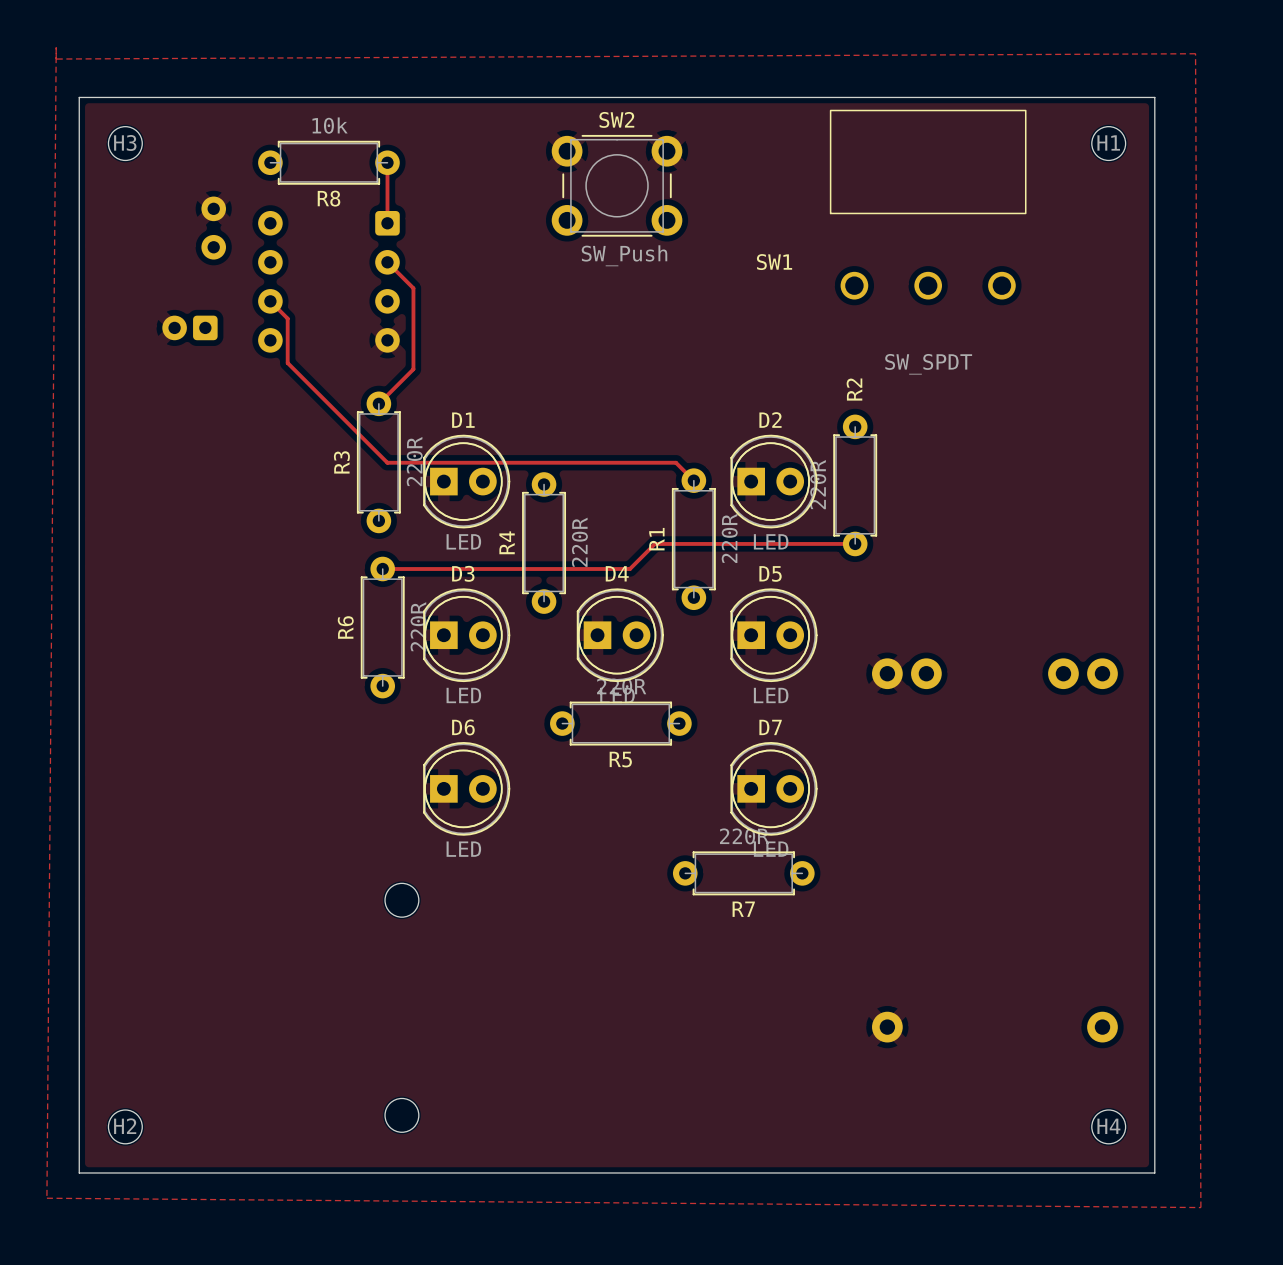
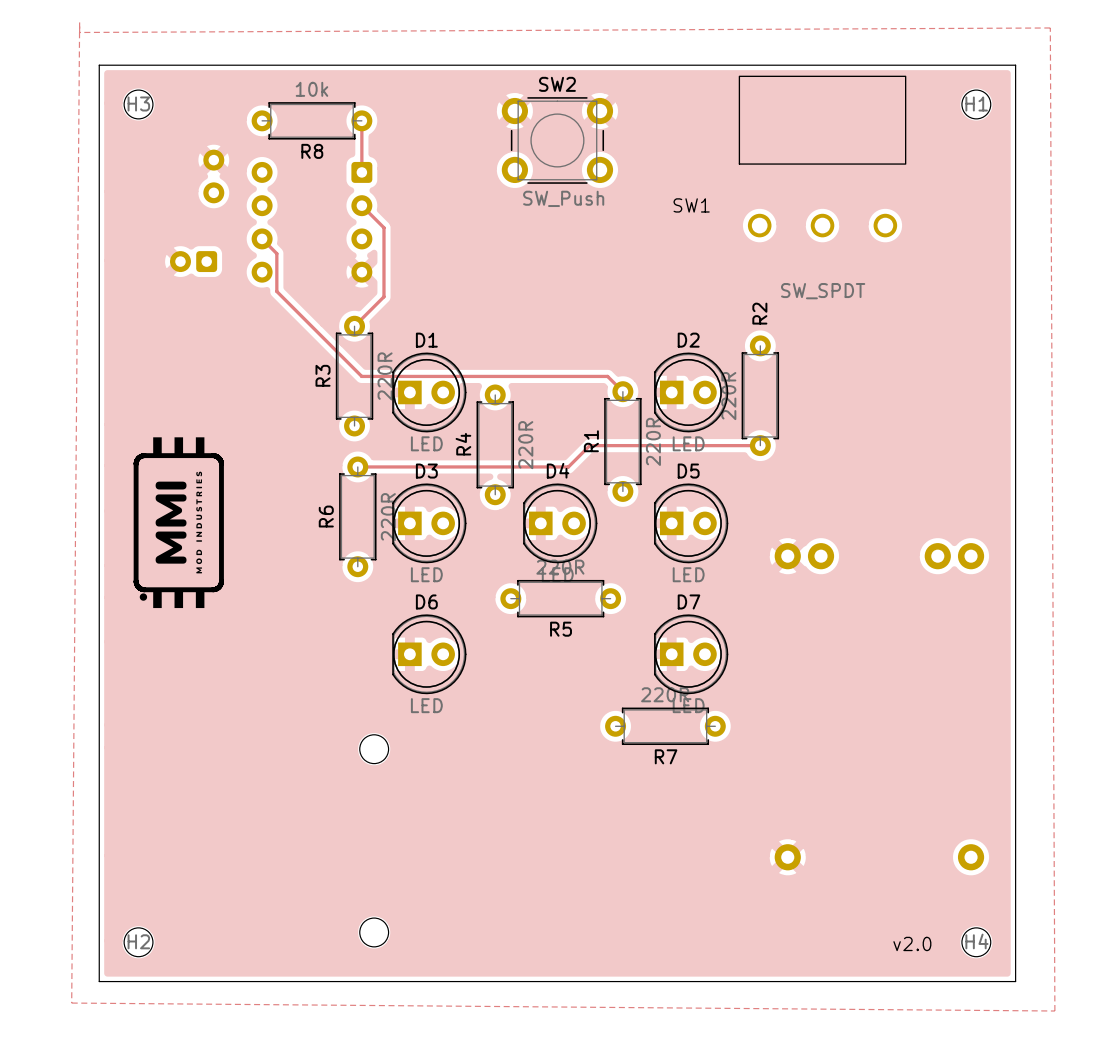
drawing: none -> [153, 437, 205, 456]
line: none -> (144, 455) (138, 458) (136, 463) (137, 585) (144, 589) (217, 588) (221, 581) (220, 460) (213, 455) (144, 455)
drawing: none -> [155, 471, 203, 574]
drawing: none -> [139, 589, 205, 609]
text: none -> v2.0 (912, 943)

